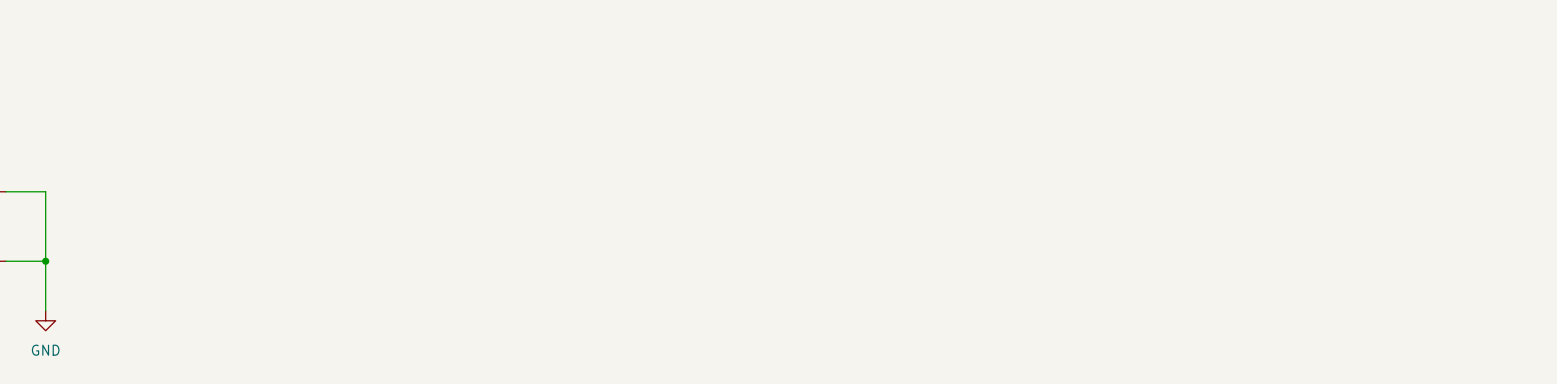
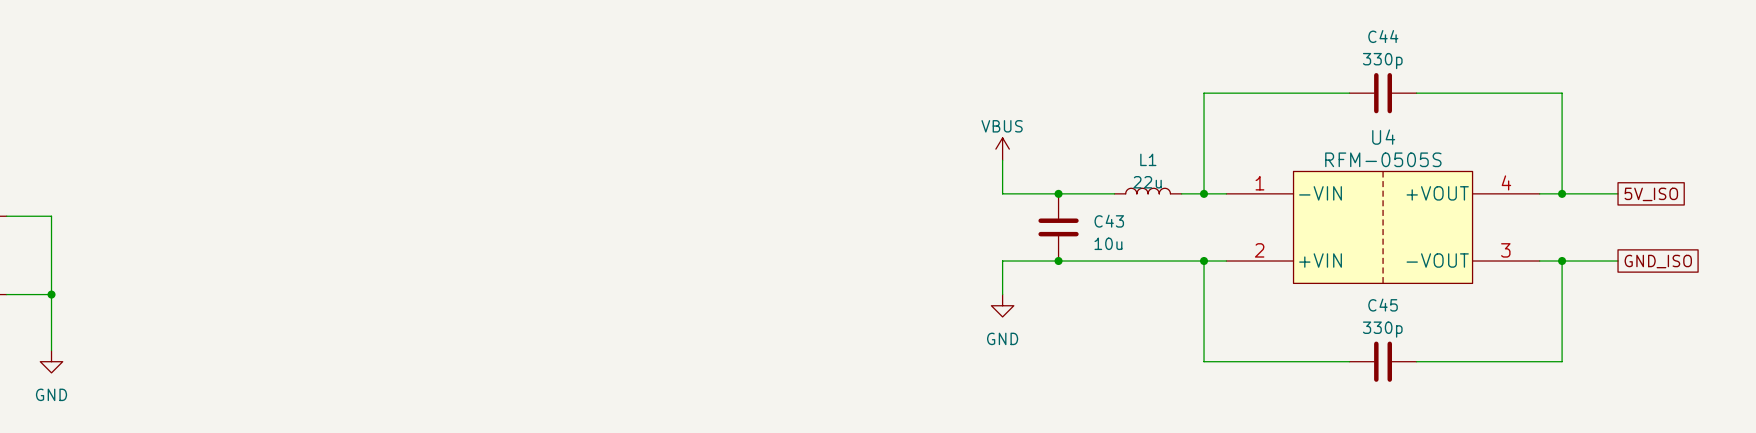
wire: none -> (1349, 93) (1204, 93) (1204, 193)
C44: none -> 330p (1383, 93)
wire: none -> (1416, 93) (1562, 93) (1562, 193)
power symbol: none -> VBUS (1002, 149)
wire: none -> (1002, 160) (1002, 193) (1114, 193)
L1: none -> 22u (1148, 191)
junction: none -> (1058, 193)
wire: none -> (1181, 193) (1226, 193)
junction: none -> (1204, 193)
wire: none -> (1539, 193) (1618, 193)
junction: none -> (1562, 193)
global label: none -> 5V_ISO (1651, 194)
C43: none -> 10u (1058, 227)
U4: none -> RFM-0505S (1383, 227)
junction: none -> (1058, 261)
wire: none -> (1204, 261) (1204, 361) (1349, 361)
junction: none -> (1204, 261)
wire: none -> (1226, 261) (1002, 261) (1002, 294)
wire: none -> (1539, 261) (1618, 261)
wire: none -> (1562, 261) (1562, 361) (1416, 361)
junction: none -> (1562, 261)
global label: none -> GND_ISO (1658, 261)
power symbol: none -> GND (1002, 305)
C45: none -> 330p (1383, 361)

